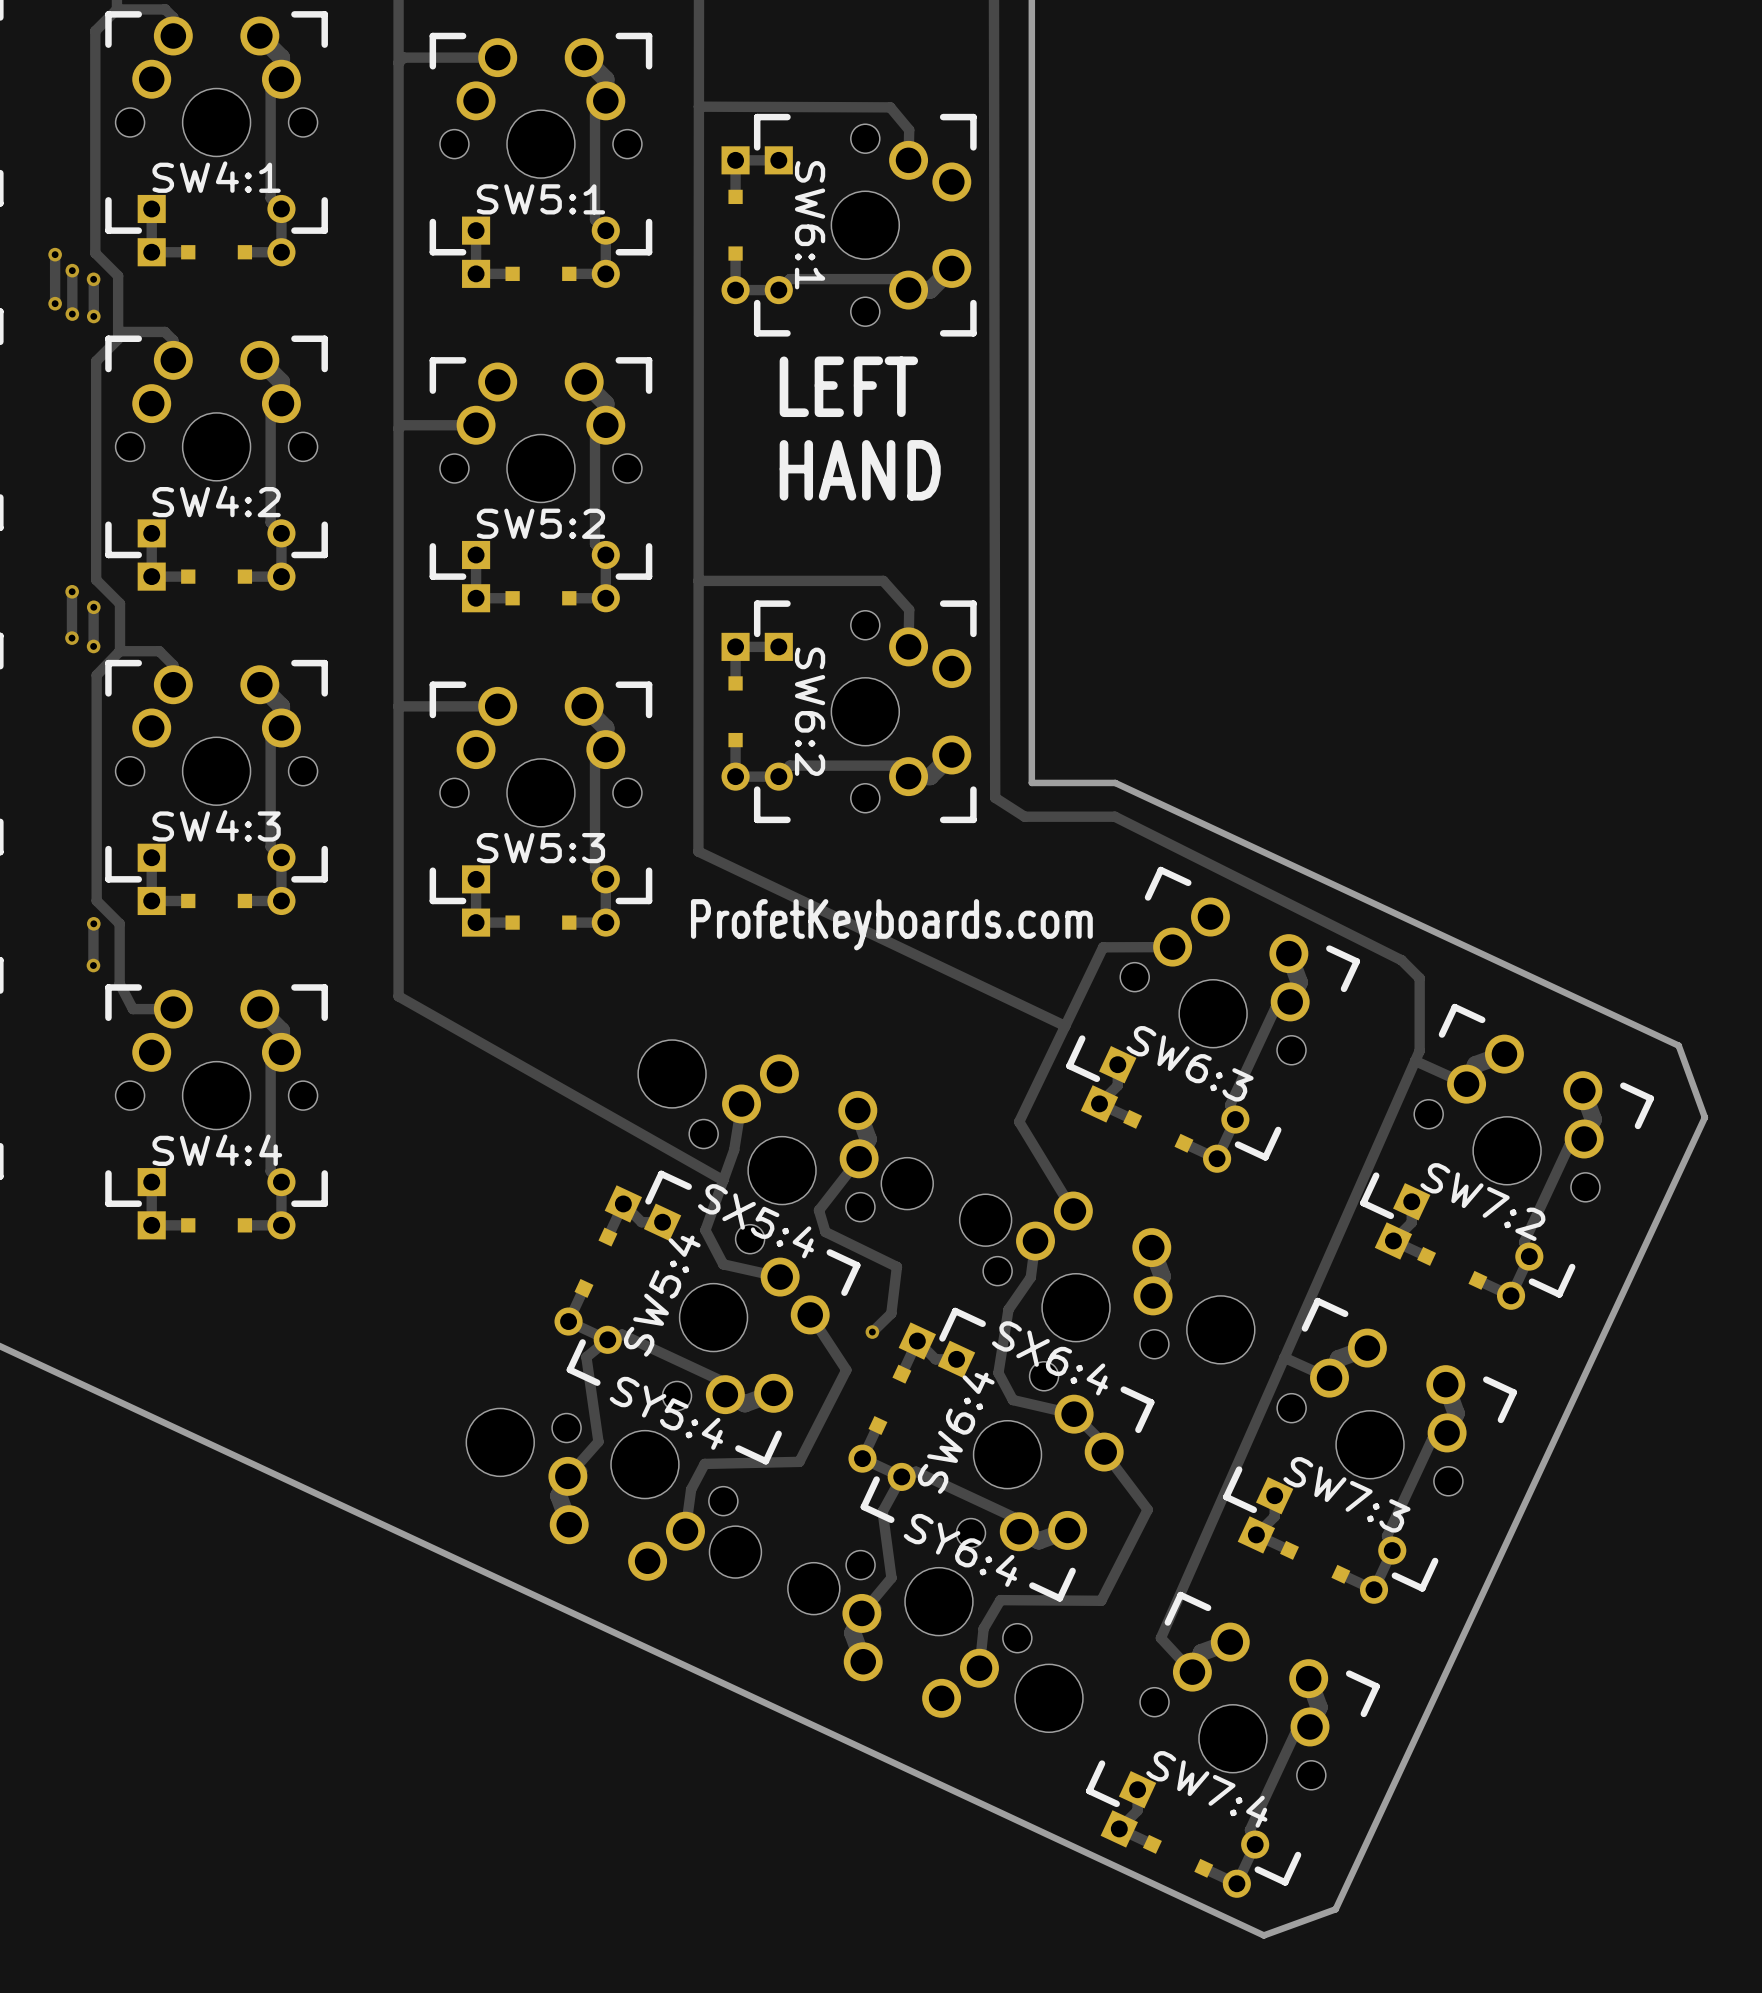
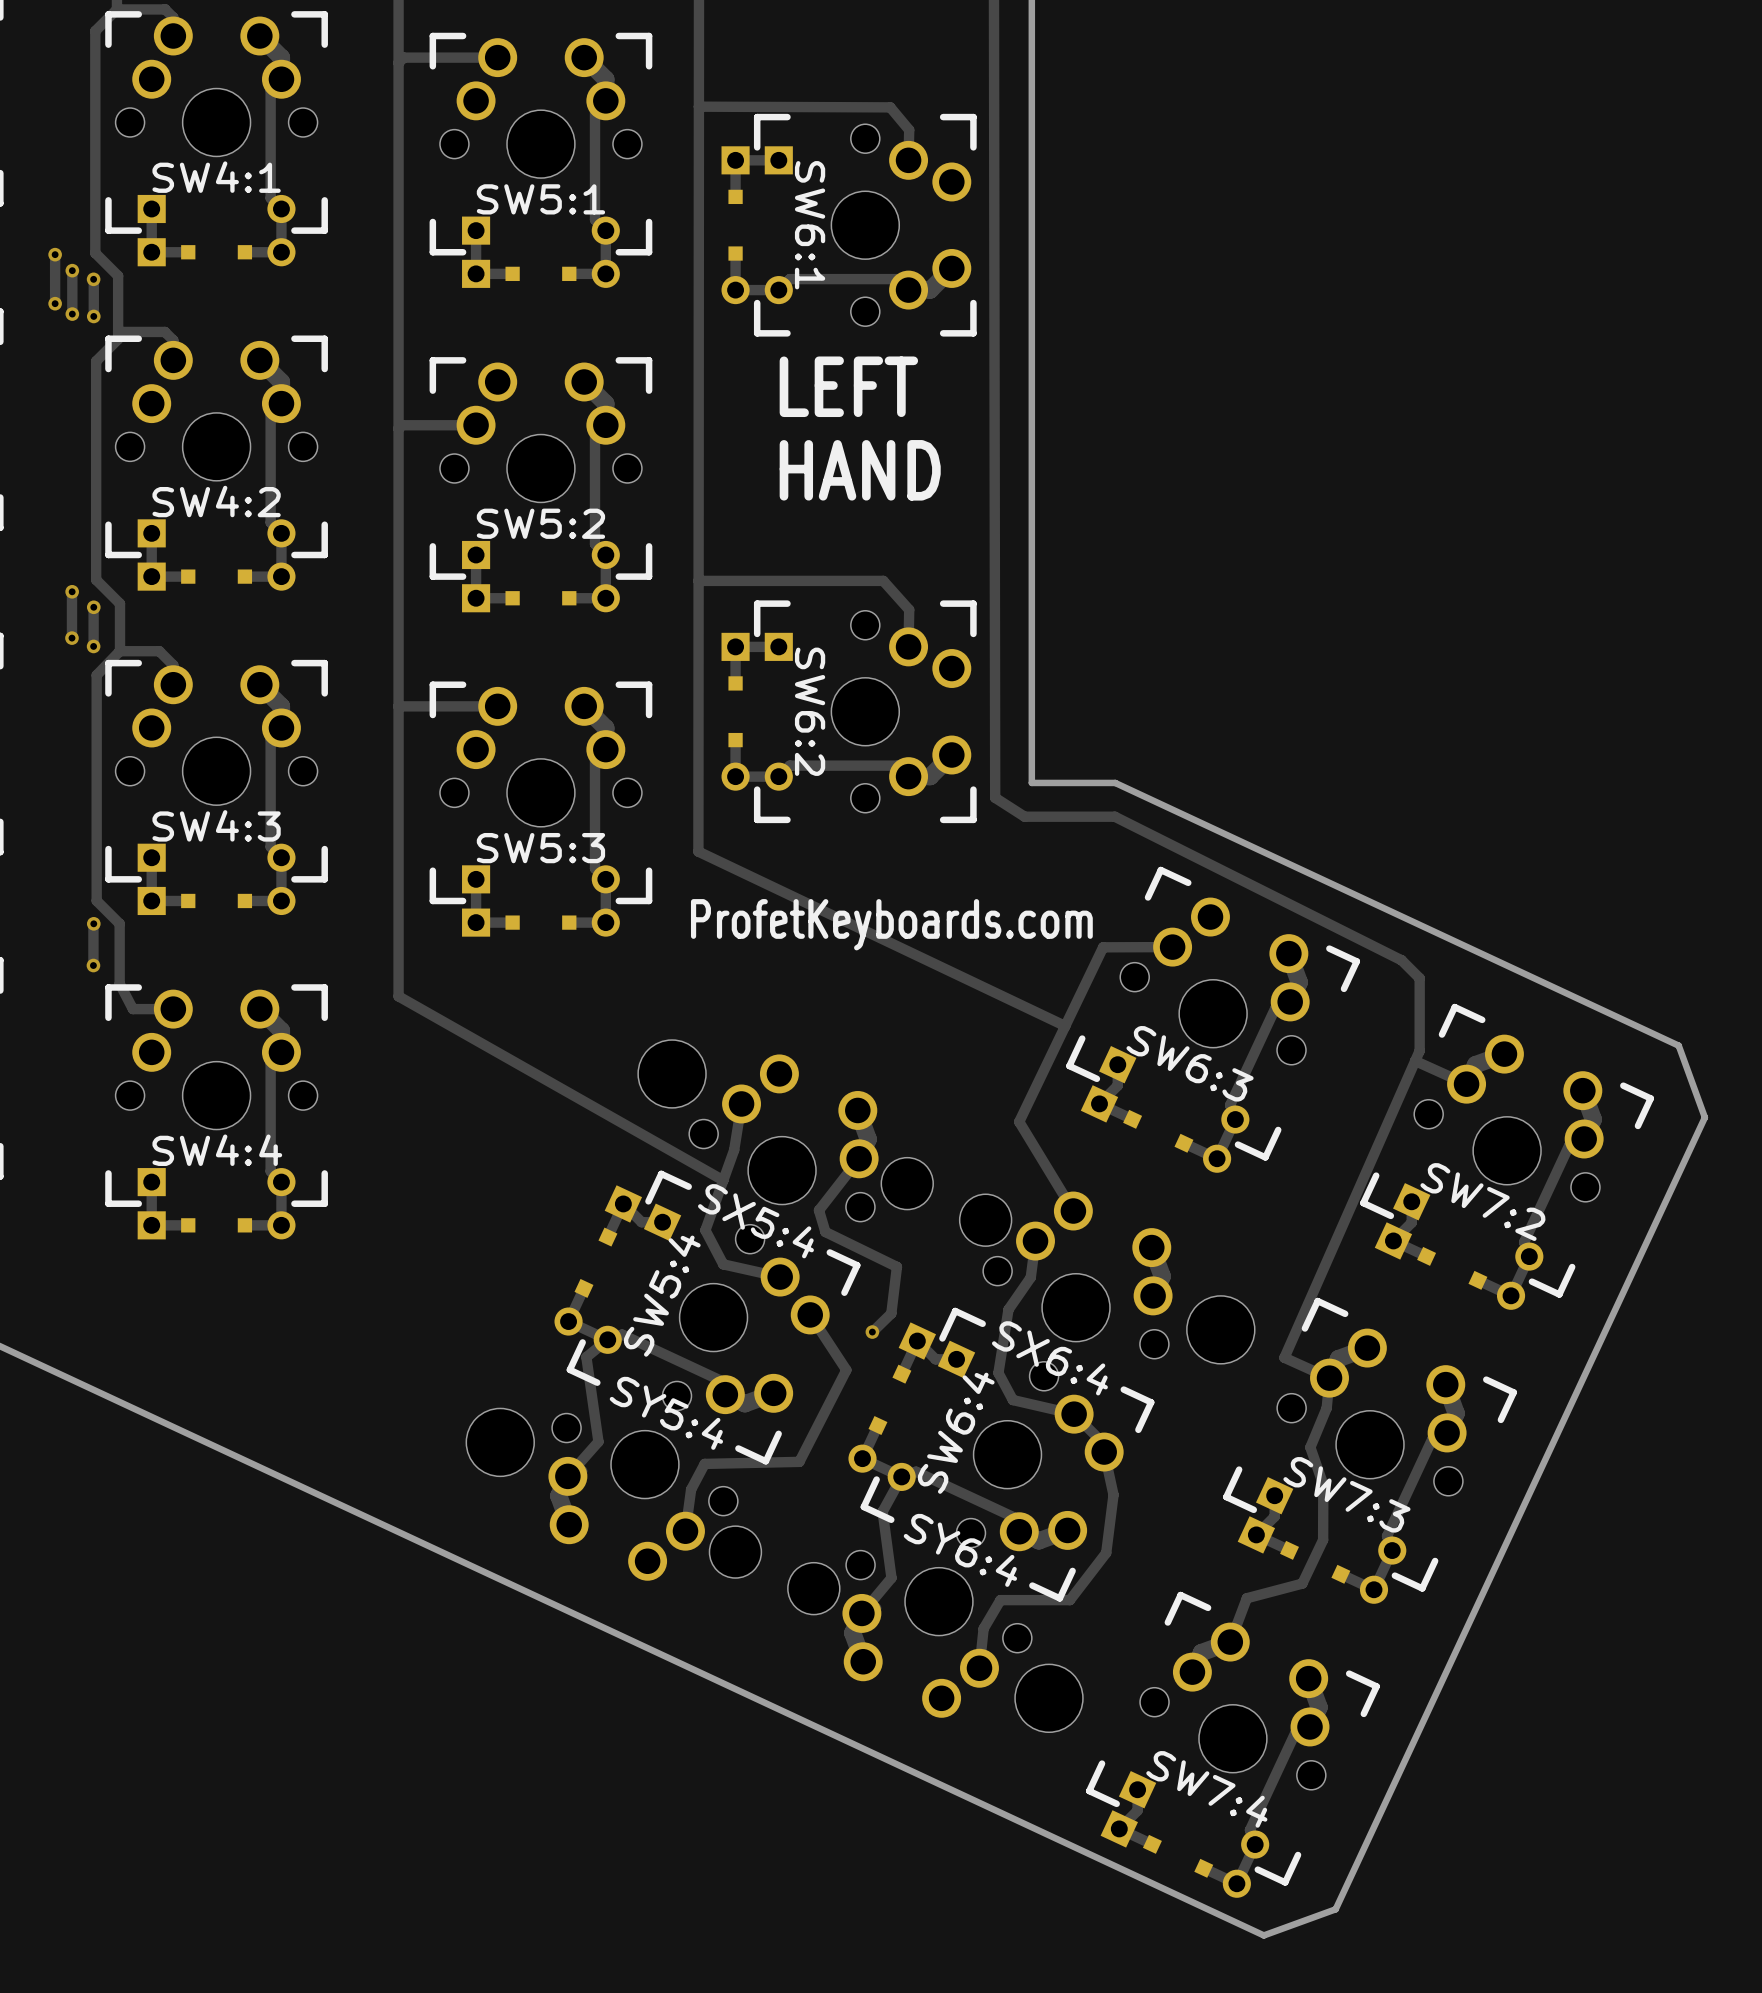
track: (1284, 1357) (1160, 1638) (1192, 1672) -> none
track: none -> (1329, 1378) (1326, 1408) (1310, 1447) (1323, 1484) (1323, 1540) (1302, 1583) (1246, 1598) (1230, 1642)
track: (1104, 1452) (1147, 1509) (1101, 1600) (1000, 1600) -> (1104, 1452) (1113, 1494) (1106, 1552) (1069, 1600) (1000, 1600)

